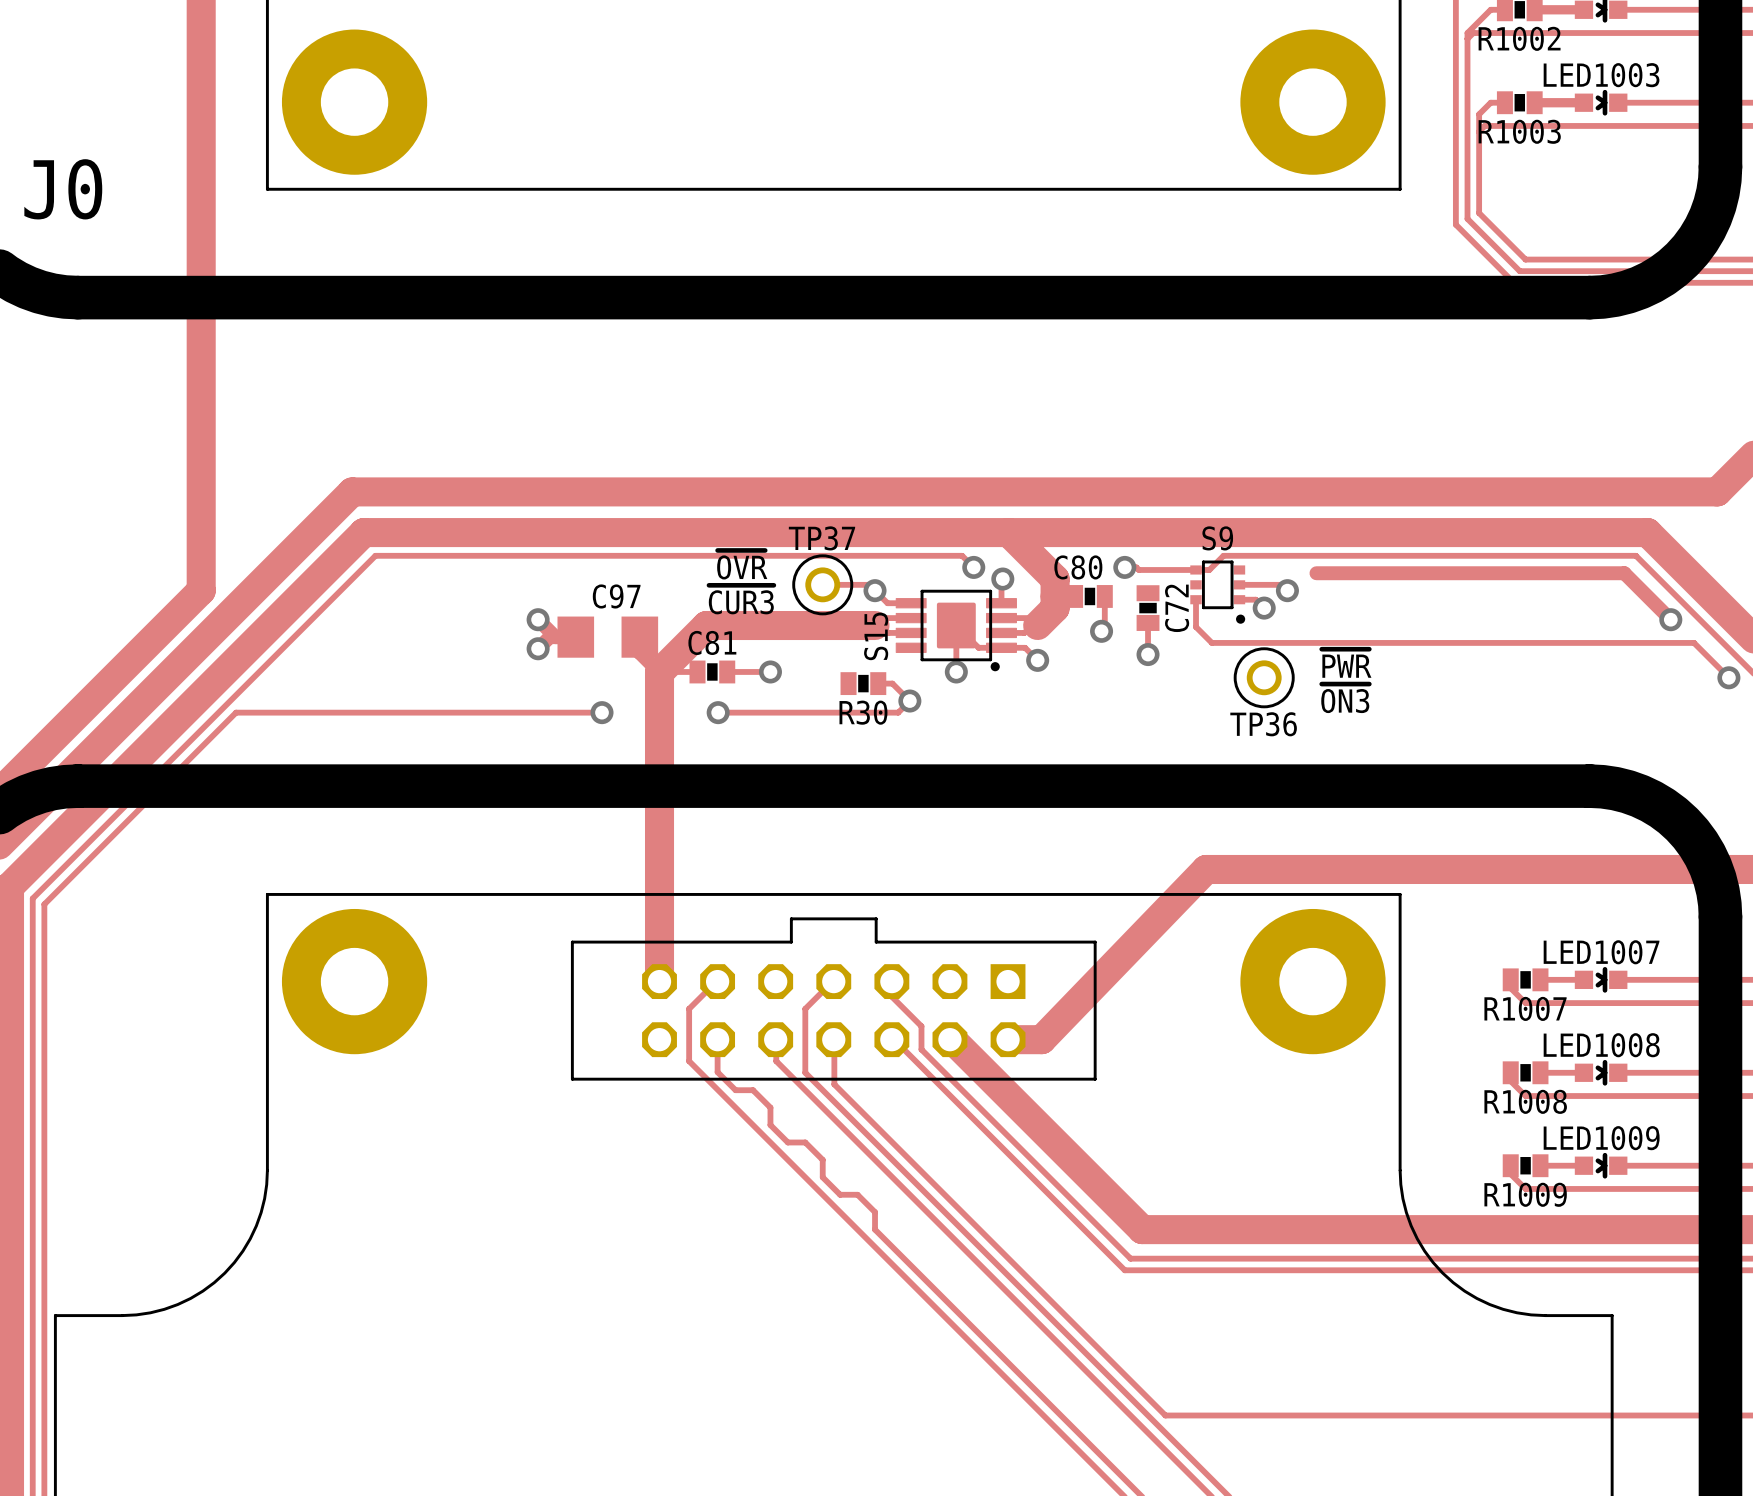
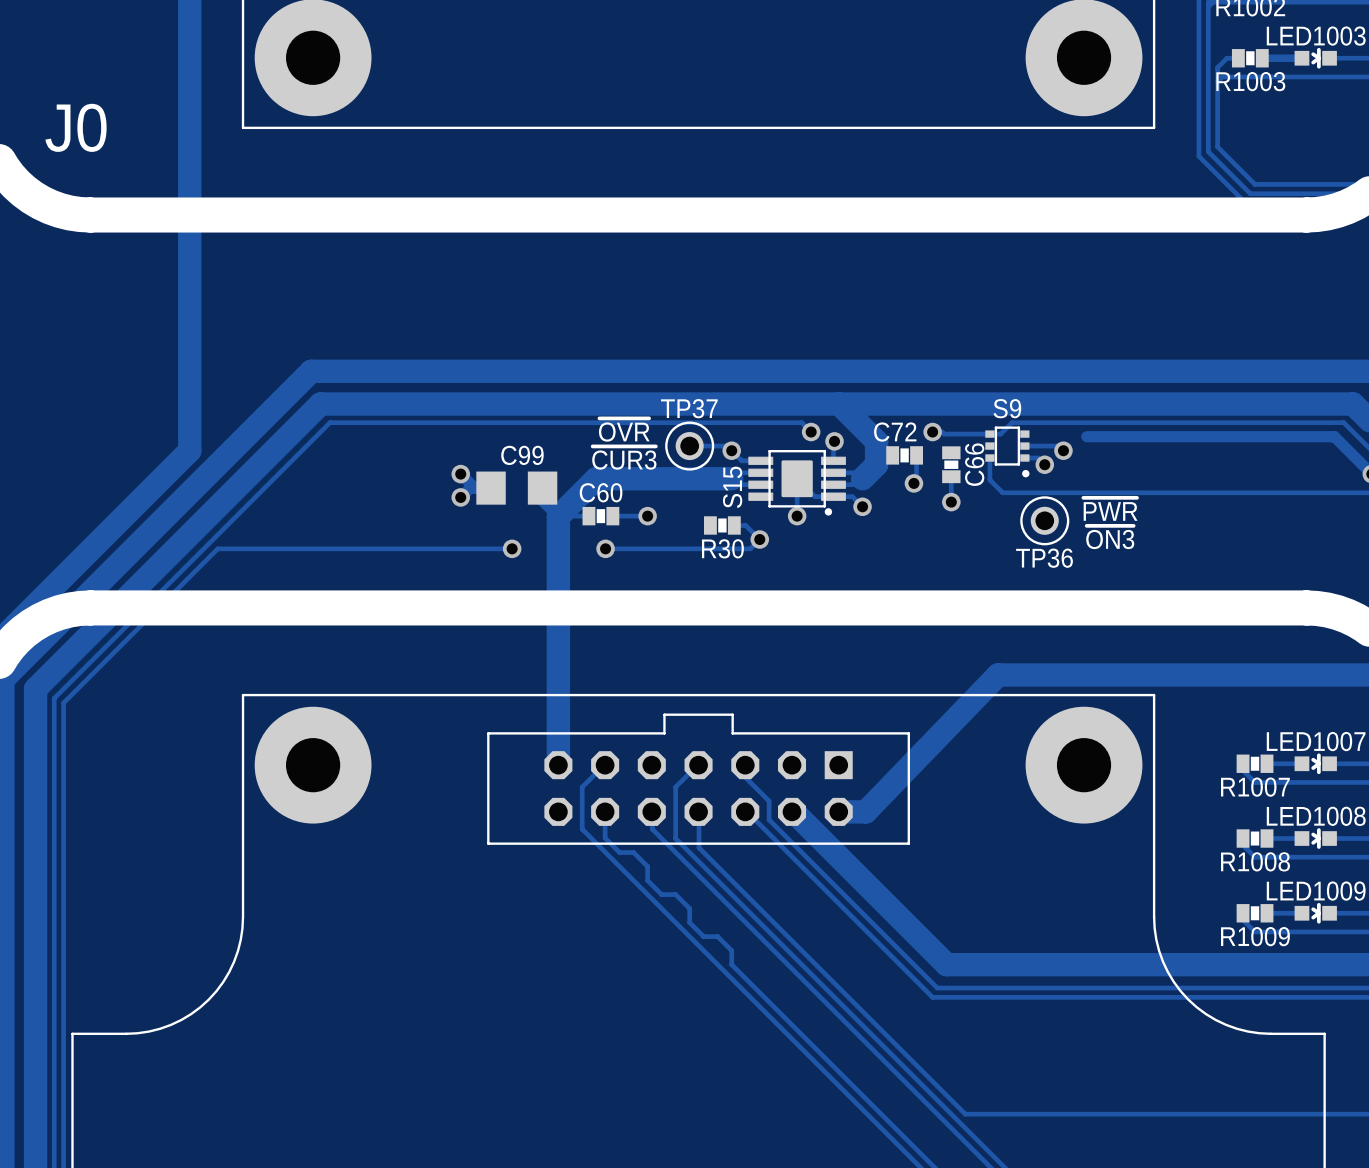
C80 name: C80 (1078, 567) -> C72 (895, 432)
C97 name: C97 (616, 596) -> C99 (522, 455)
C72 name: C72 (1177, 608) -> C66 (974, 464)
C81 name: C81 (712, 642) -> C60 (601, 492)

